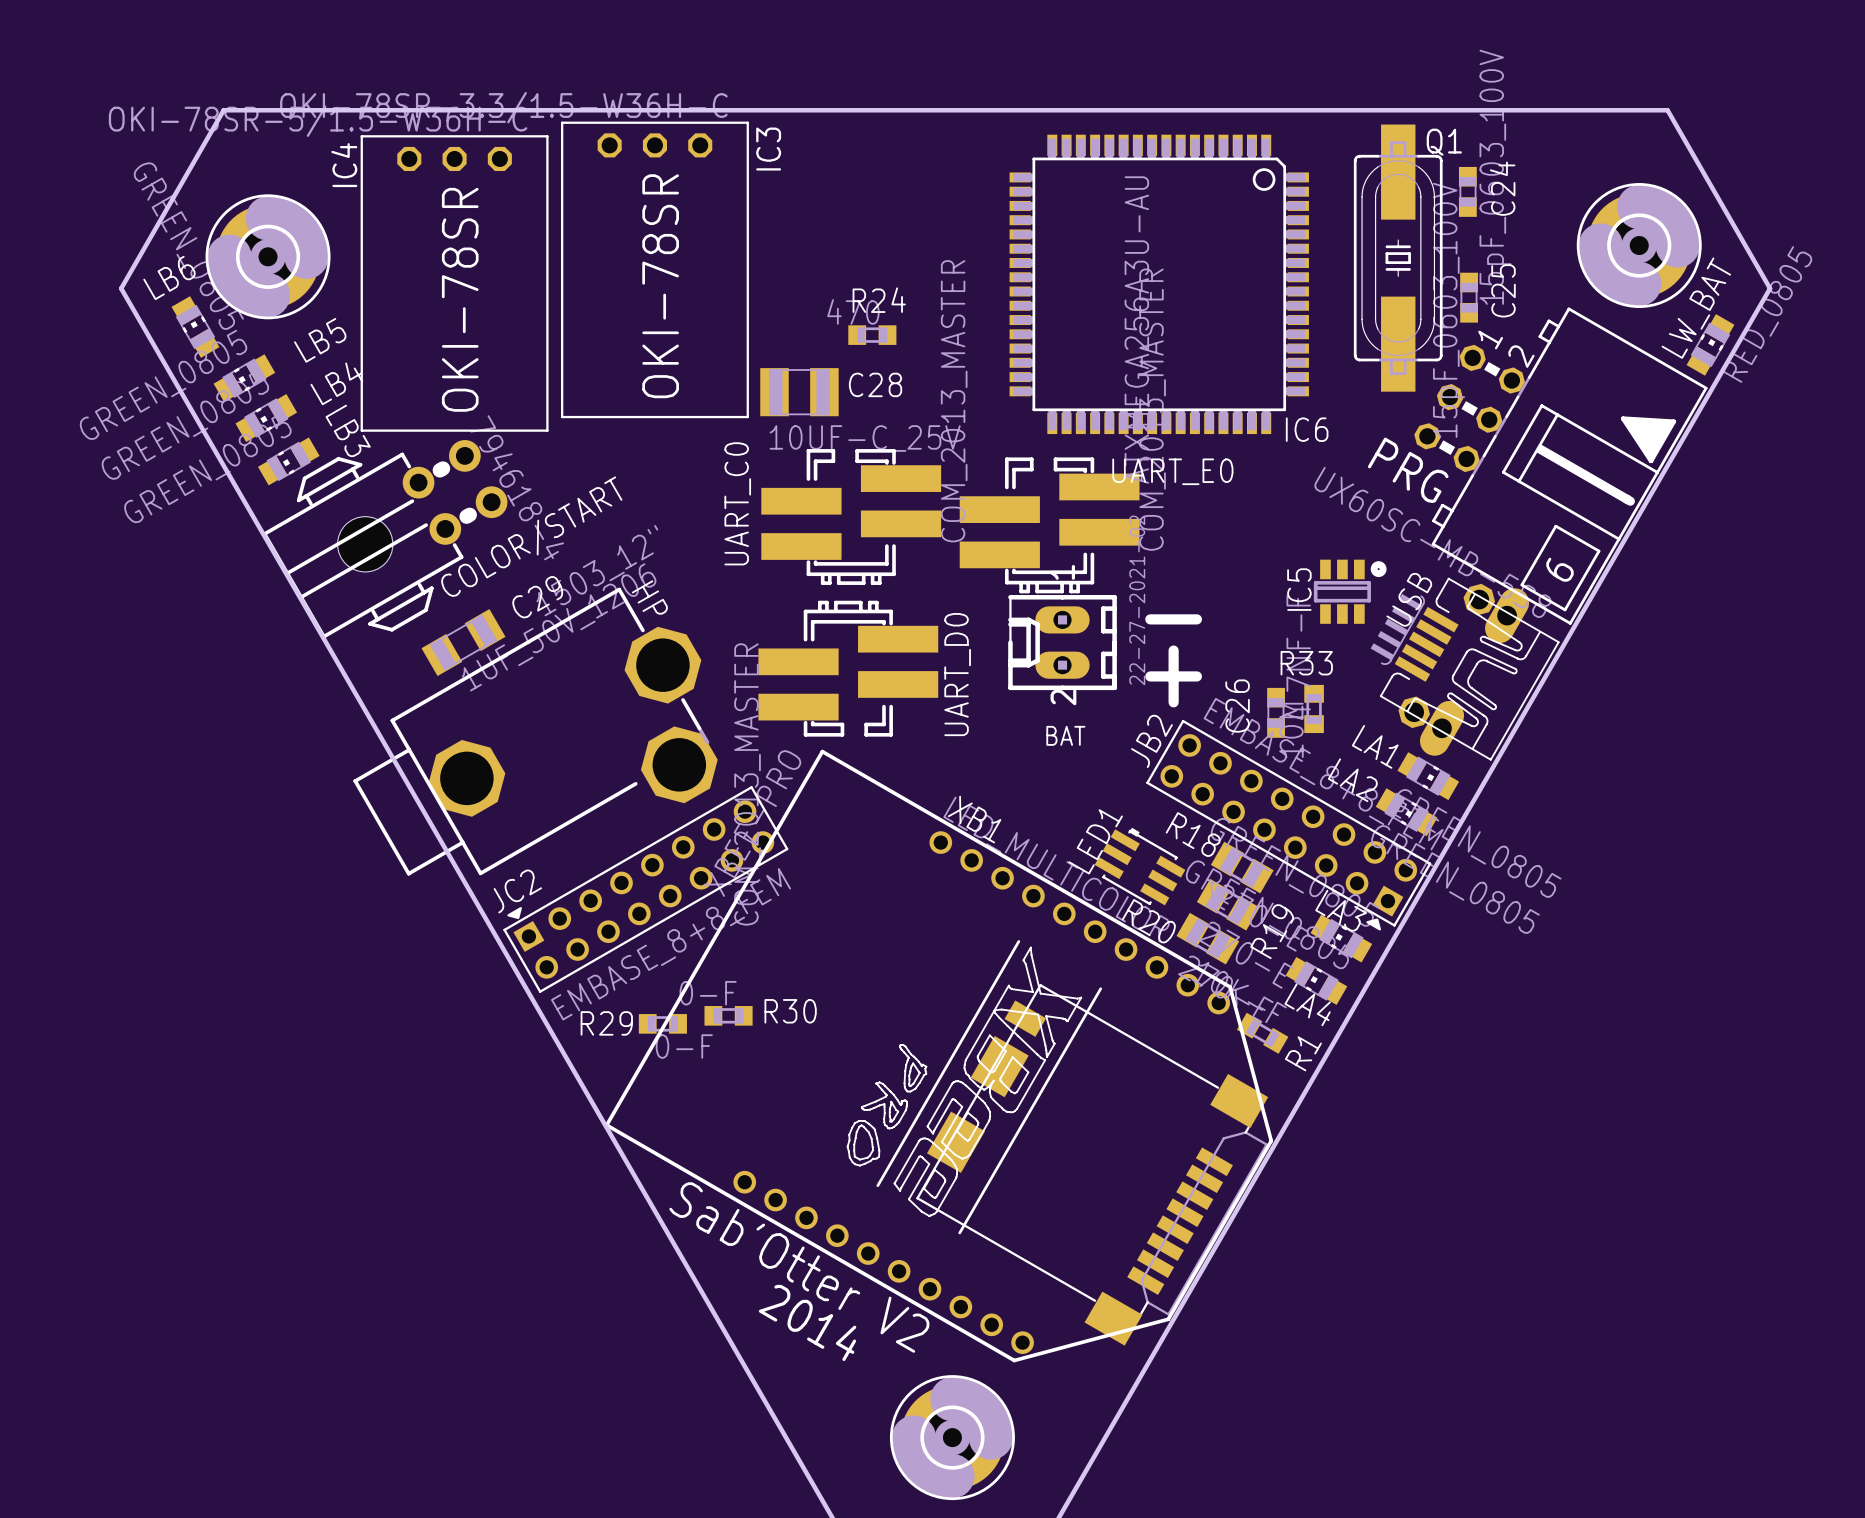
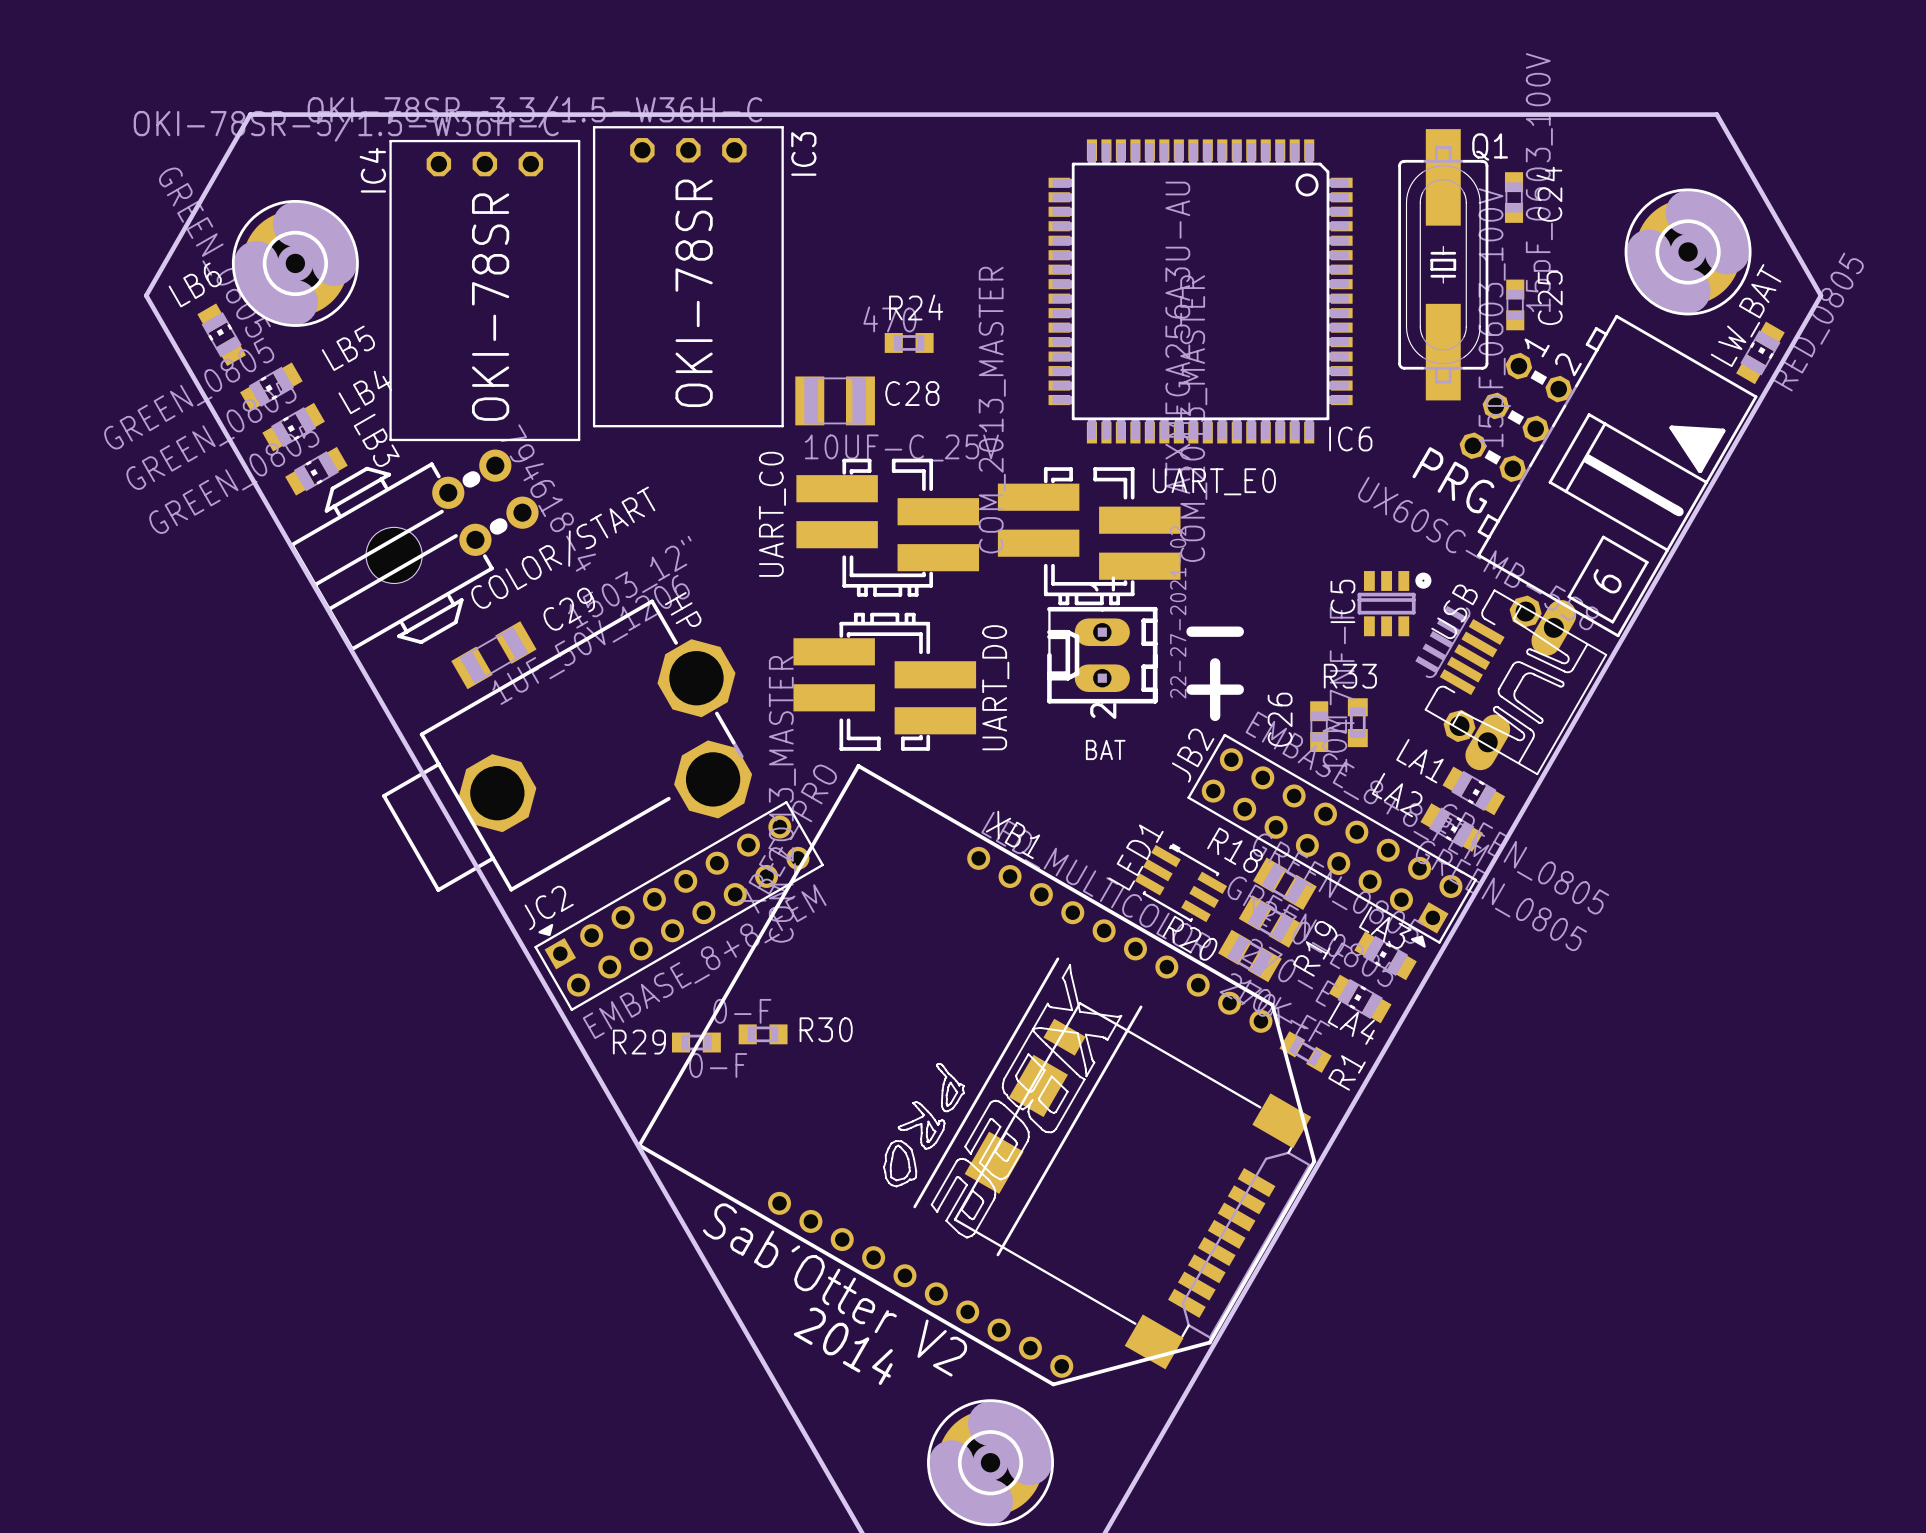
UART_C0 footprint: [761, 449, 942, 585] -> [796, 458, 980, 597]
UART_E0 footprint: [959, 457, 1140, 594] -> [997, 467, 1181, 606]
UART_D0 footprint: [758, 600, 939, 737] -> [793, 612, 977, 751]

